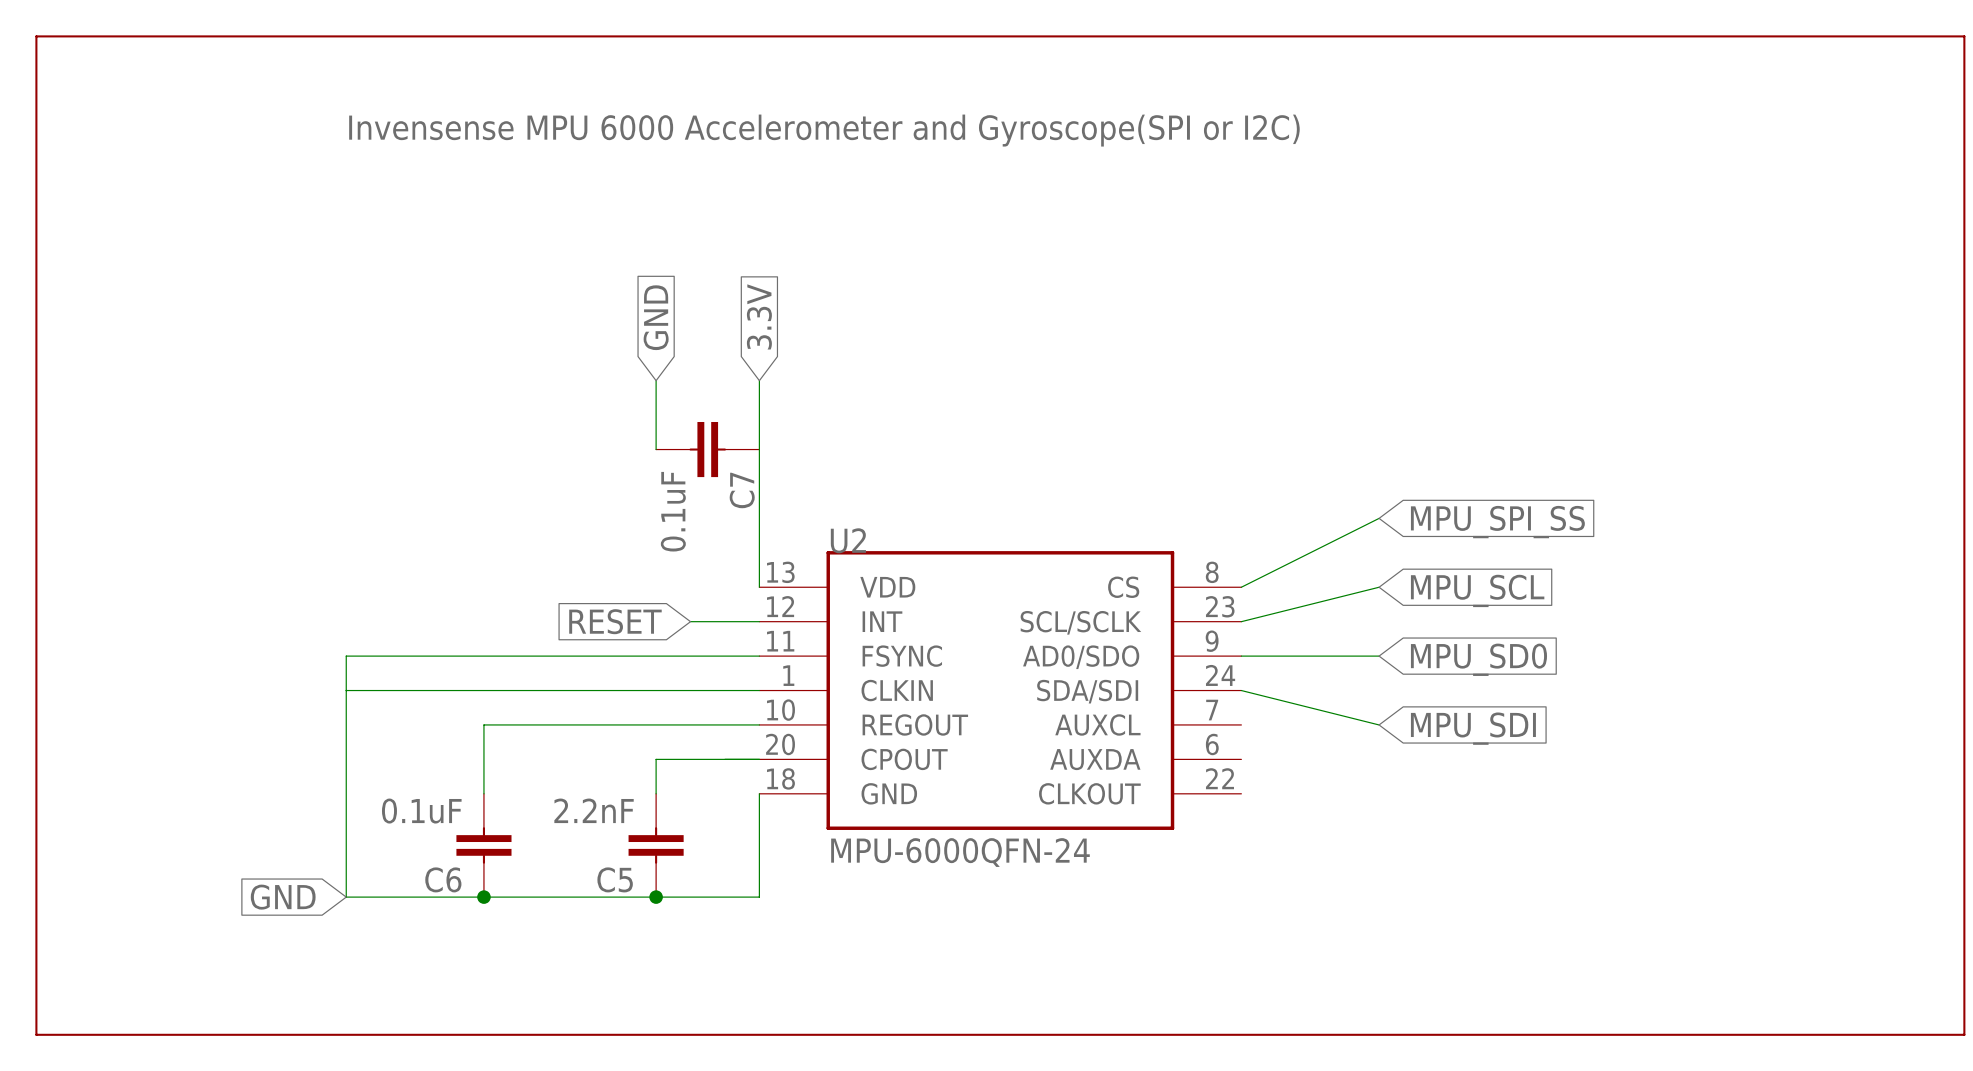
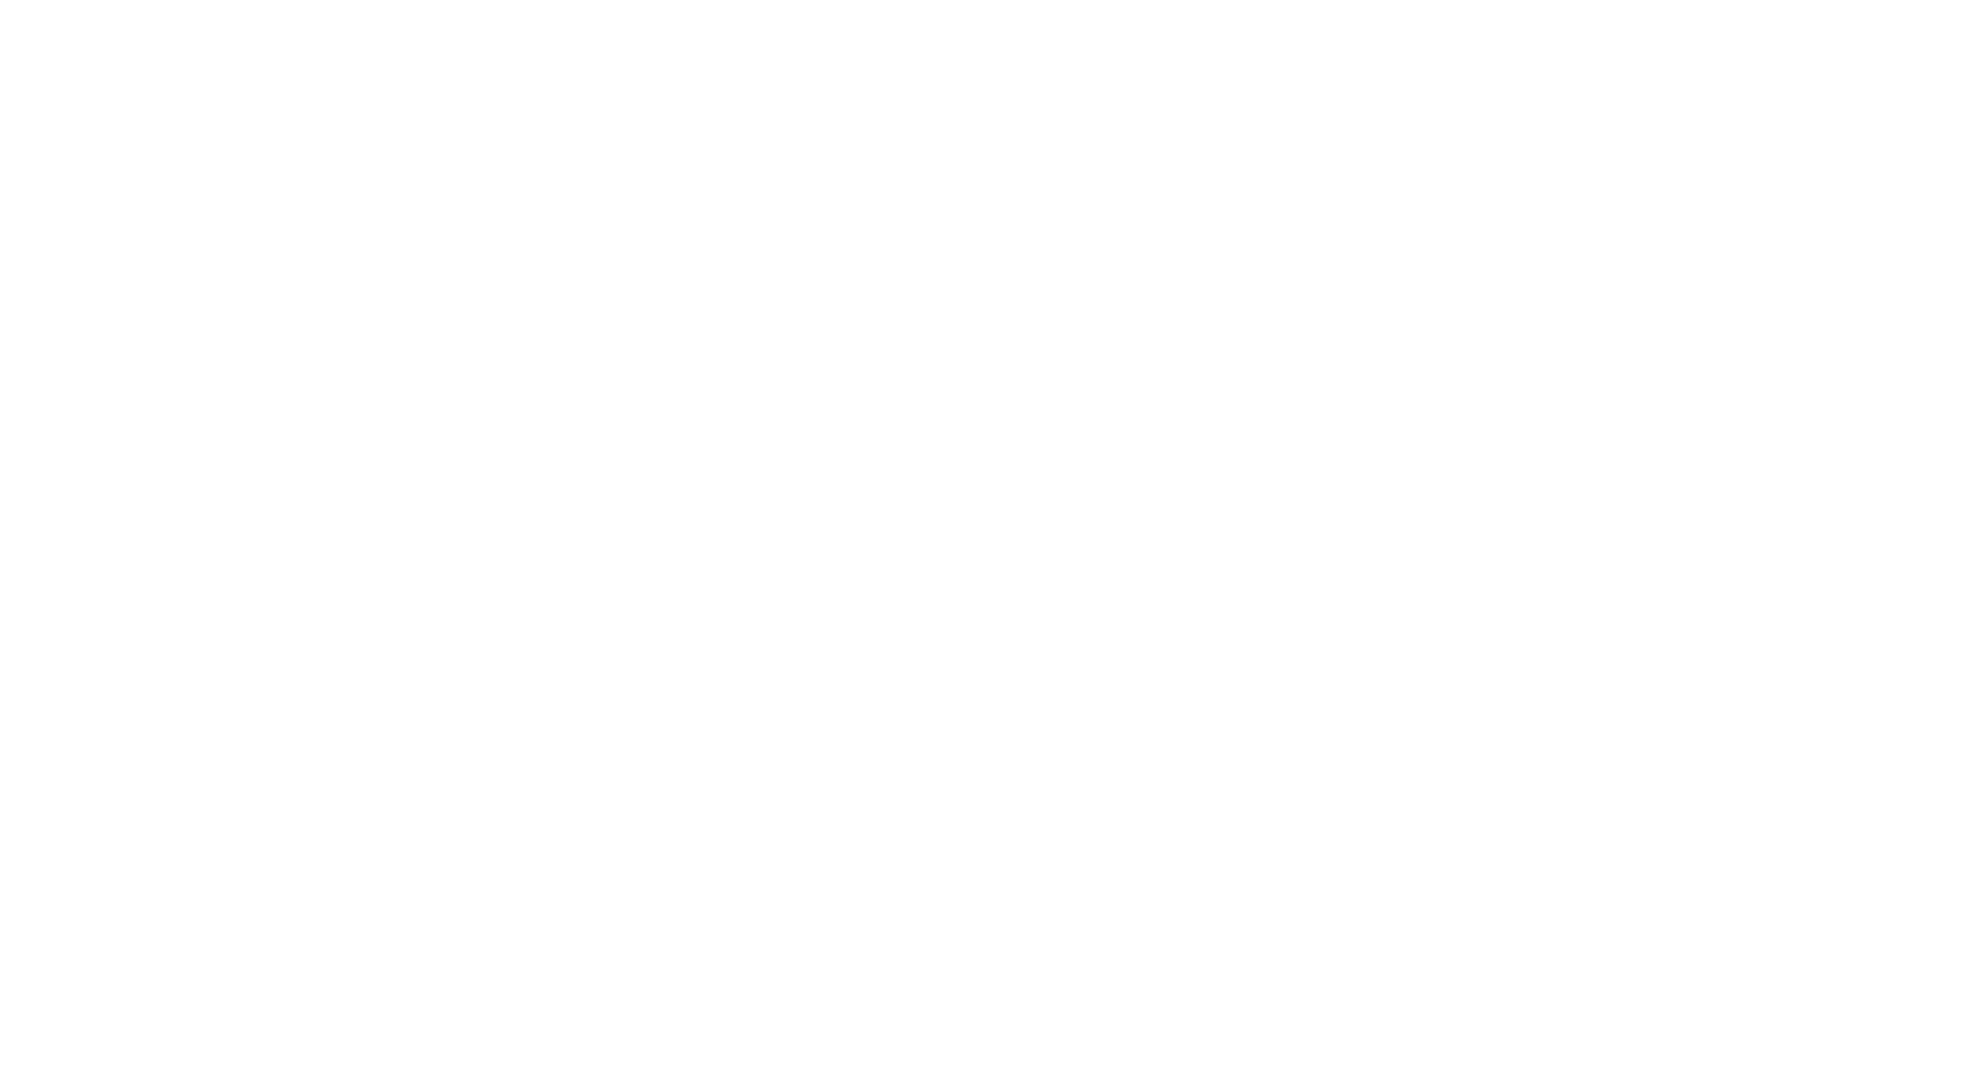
line: (36, 36) (36, 1034) (1964, 1034) (1964, 36) (36, 36) -> none
text: Invensense MPU 6000 Accelerometer and Gyroscope(SPI or I2C) (824, 130) -> none
global label: 3.3V (759, 316) -> none
global label: GND (656, 317) -> none
wire: (656, 380) (656, 449) -> none
wire: (759, 380) (759, 587) -> none
C7: 0.1uF (707, 449) -> none
wire: (1379, 518) (1241, 587) -> none
global label: MPU_SPI_SS (1497, 522) -> none
wire: (1379, 587) (1241, 621) -> none
global label: MPU_SCL (1477, 590) -> none
global label: RESET (615, 621) -> none
wire: (690, 621) (759, 621) -> none
wire: (759, 656) (346, 656) (346, 897) (759, 897) (759, 793) -> none
wire: (1241, 656) (1379, 656) -> none
global label: MPU_SD0 (1478, 659) -> none
wire: (346, 690) (759, 690) -> none
U2: MPU-6000QFN-24 (1000, 690) -> none
wire: (1241, 690) (1379, 724) -> none
wire: (759, 724) (483, 724) (483, 793) -> none
global label: MPU_SDI (1473, 728) -> none
wire: (759, 759) (656, 759) (656, 793) -> none
C6: 0.1uF (483, 845) -> none
C5: 2.2nF (656, 845) -> none
global label: GND (283, 897) -> none
junction: (483, 897) -> none
junction: (656, 897) -> none

